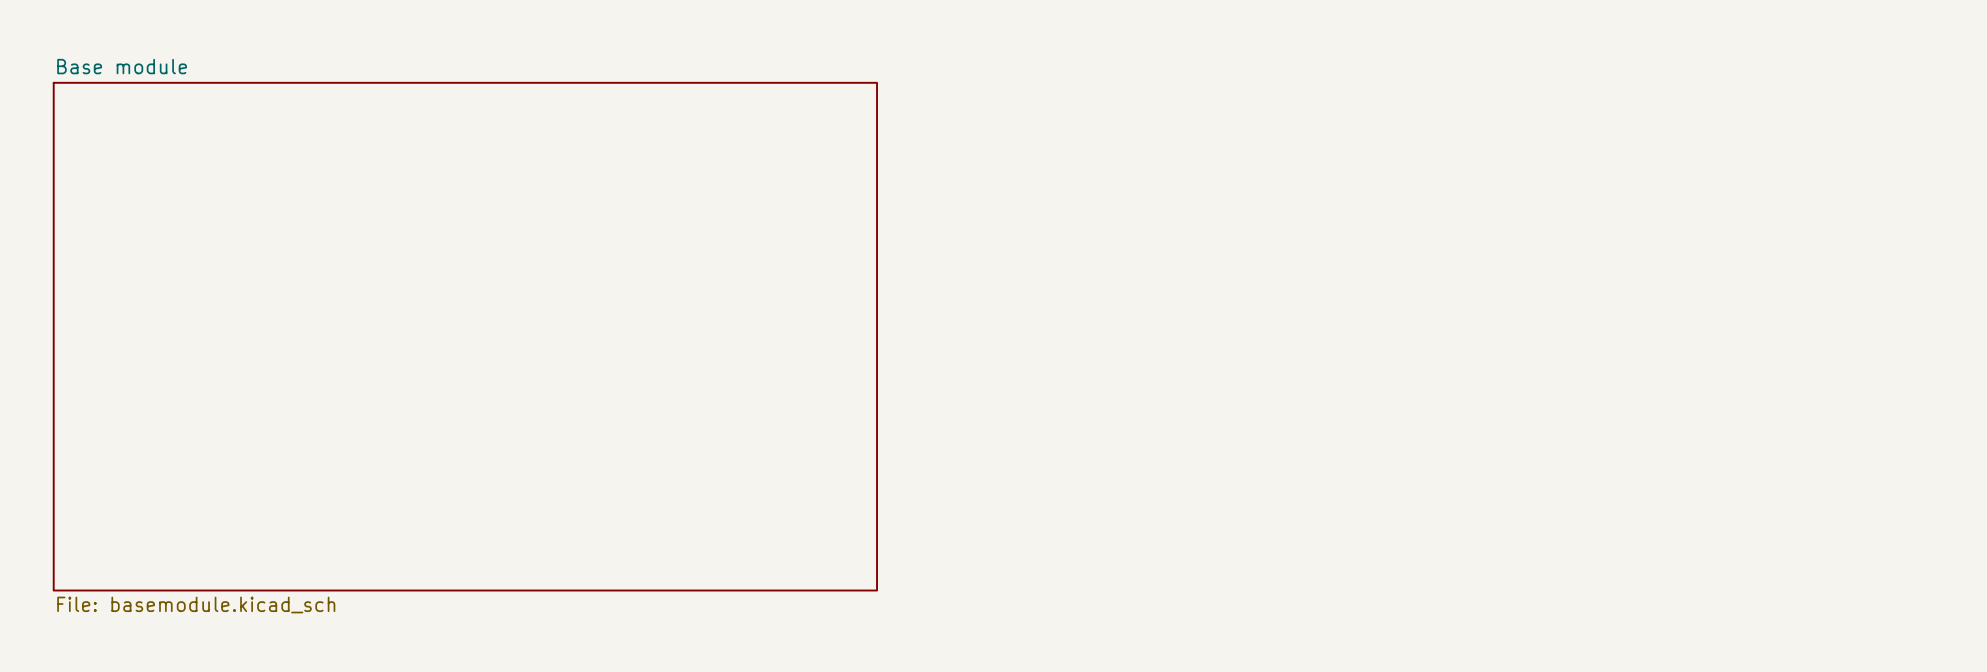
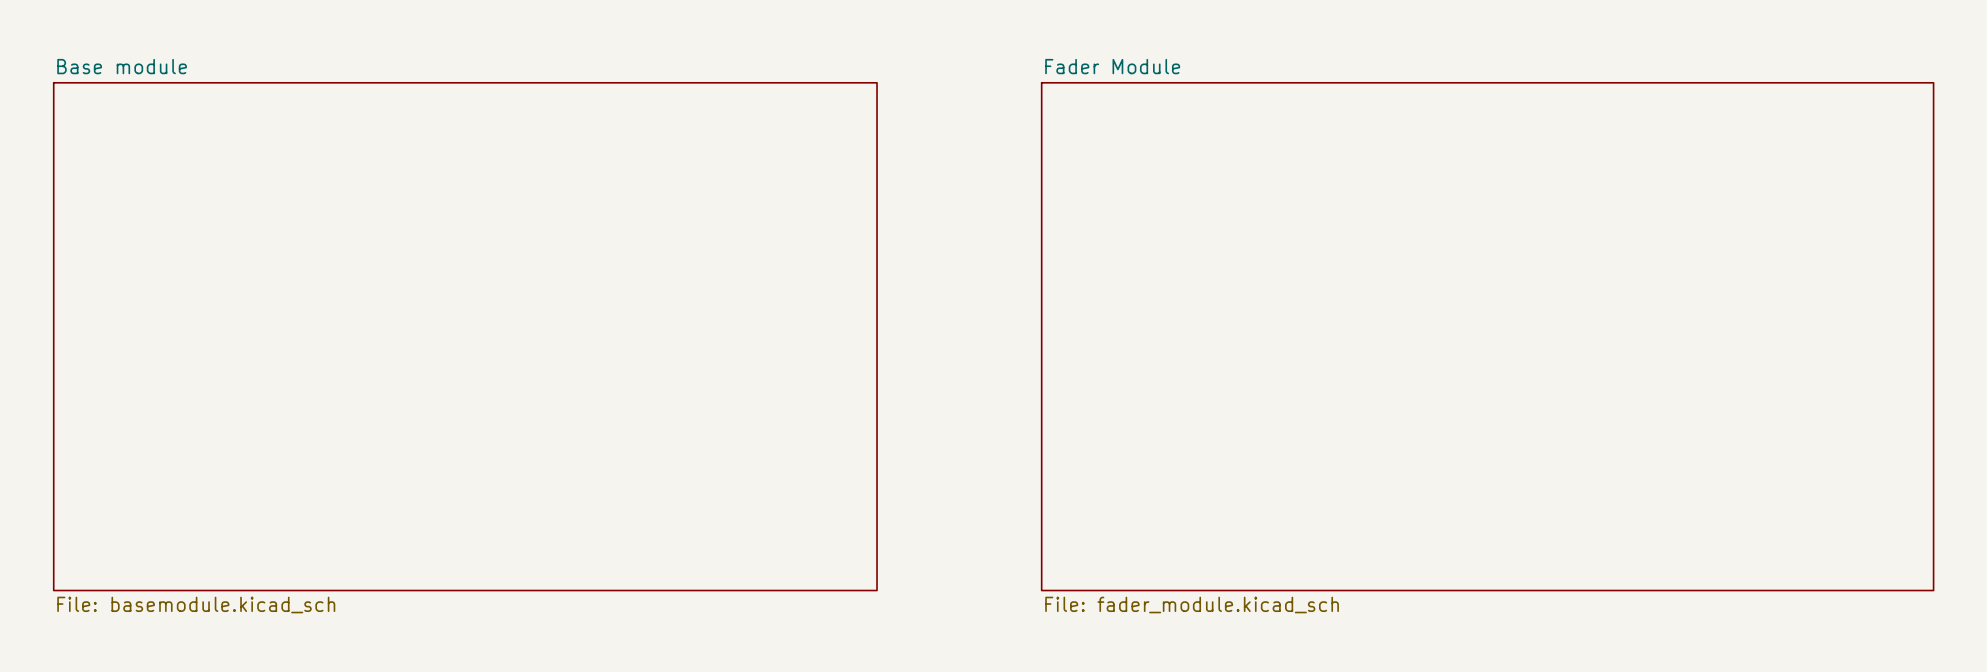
sheet Fader Module: none -> File: fader_module.kicad_sch (1487, 336)

